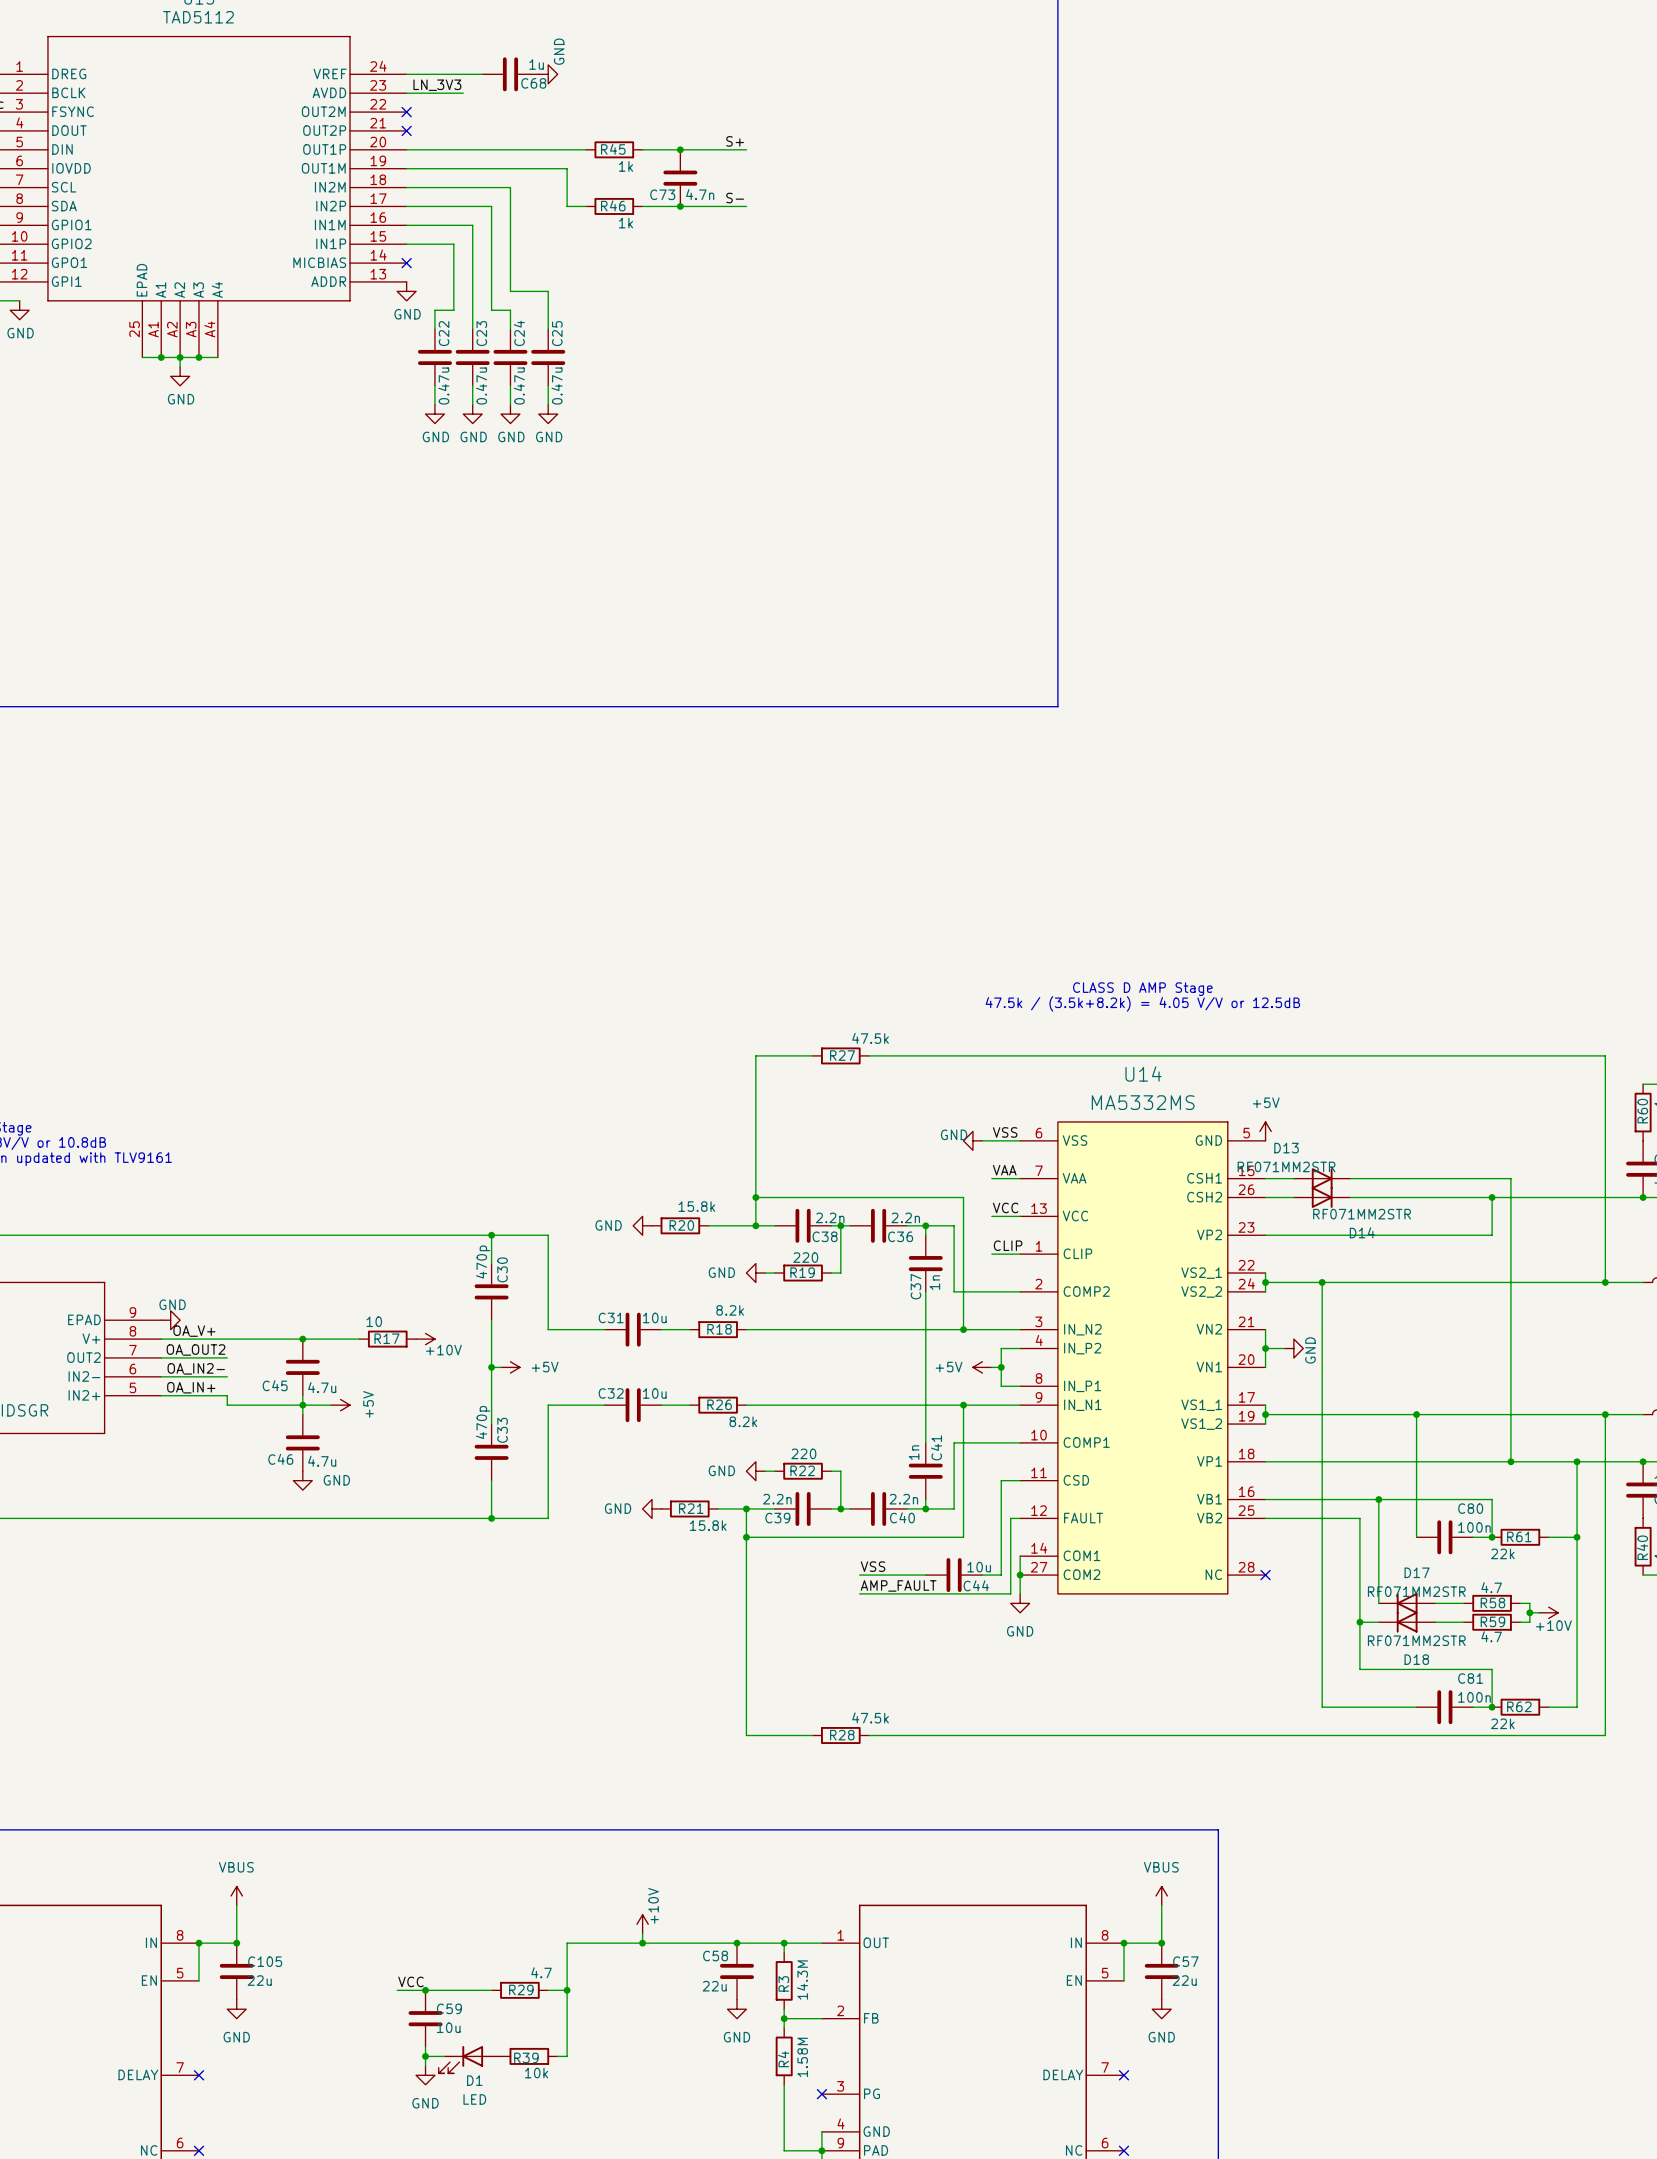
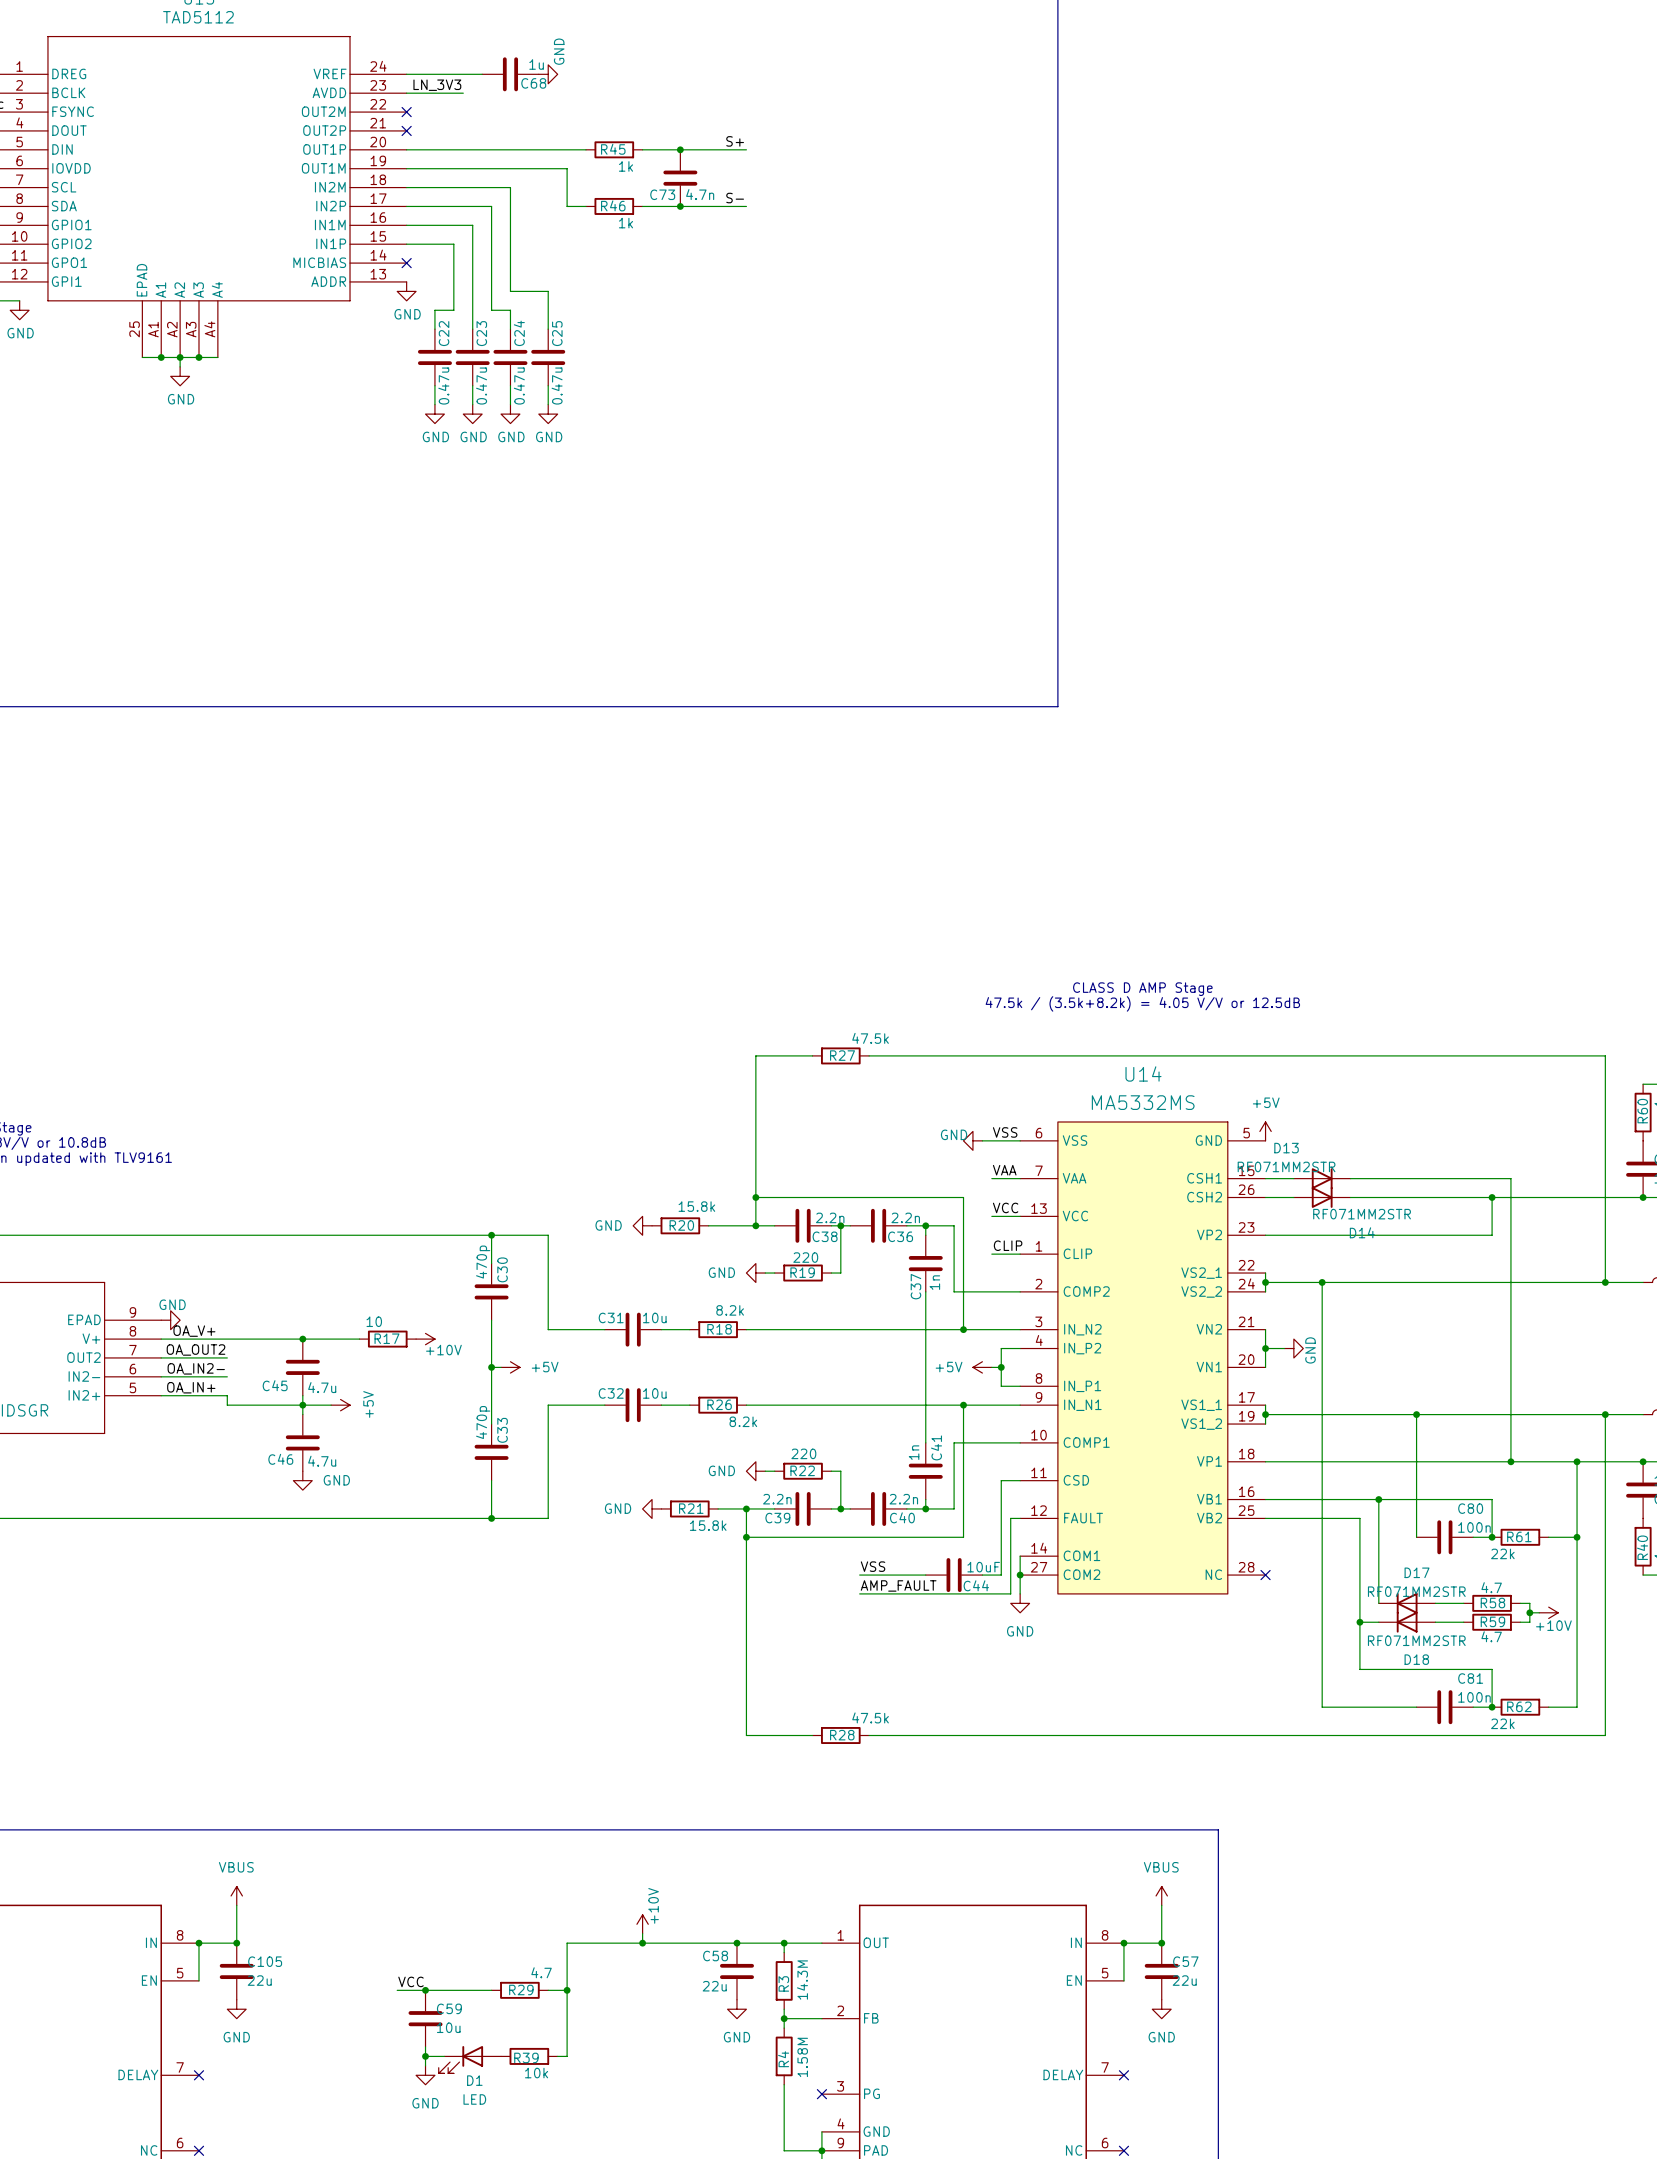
C44 value: 10u (979, 1567) -> 10uF (983, 1567)

